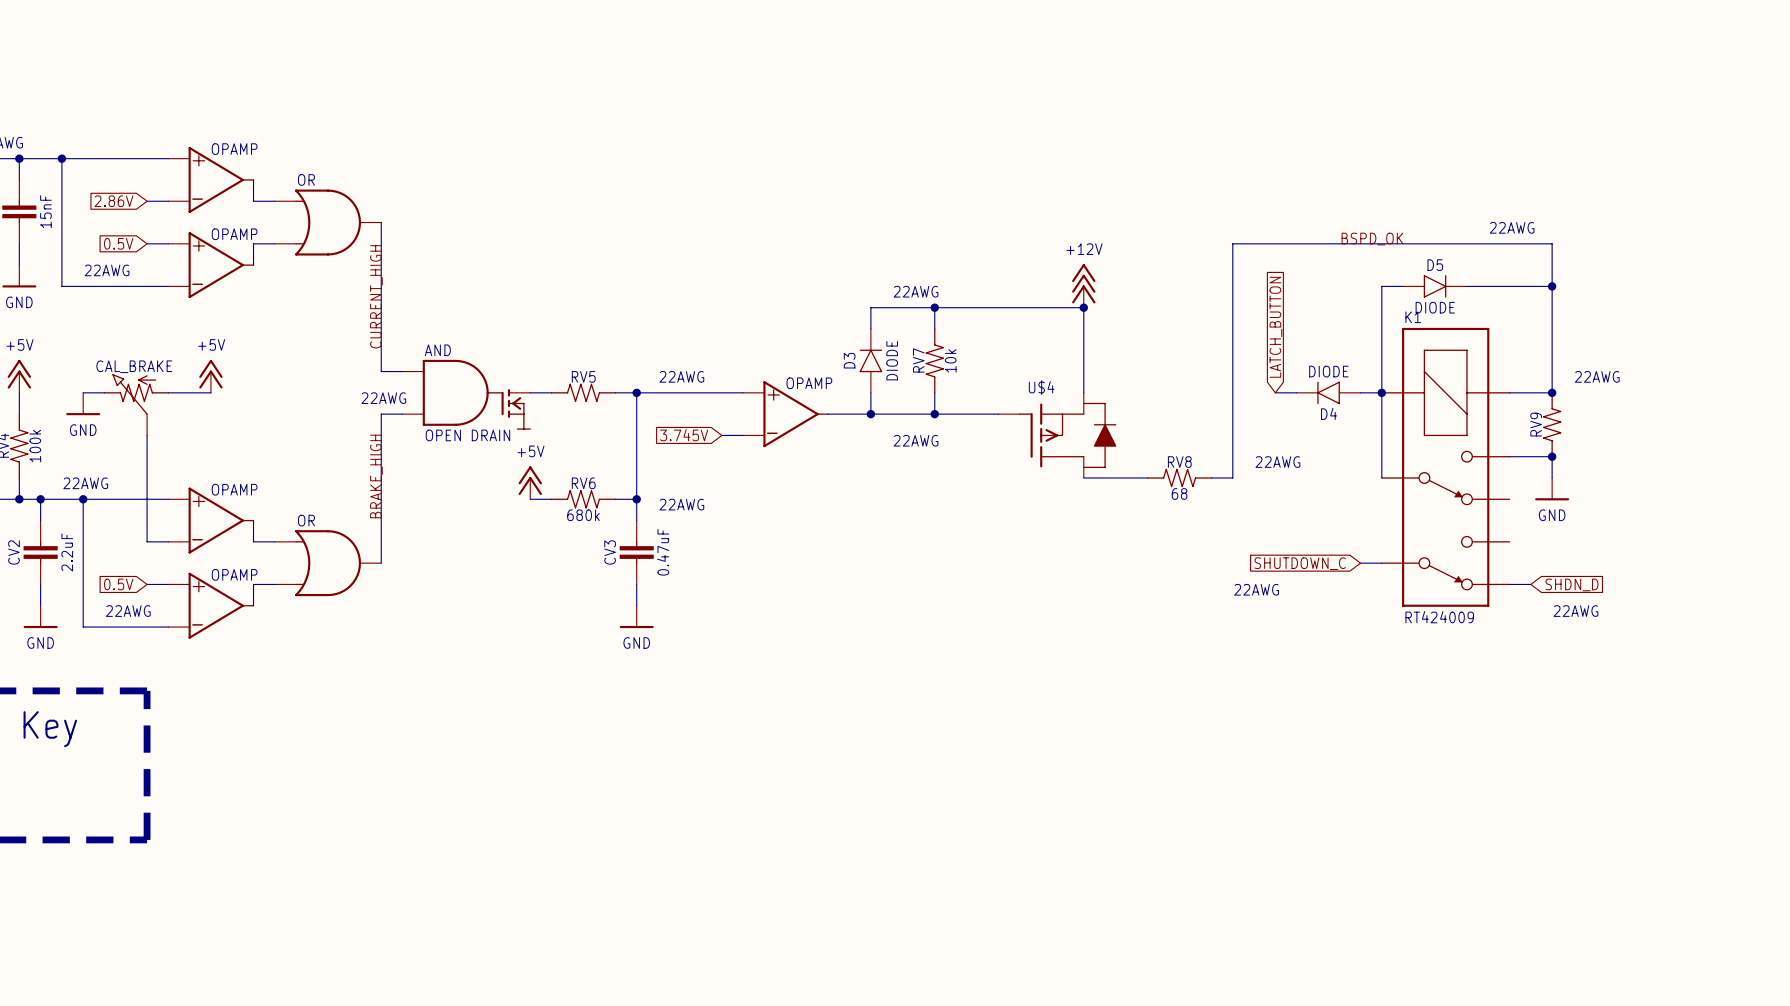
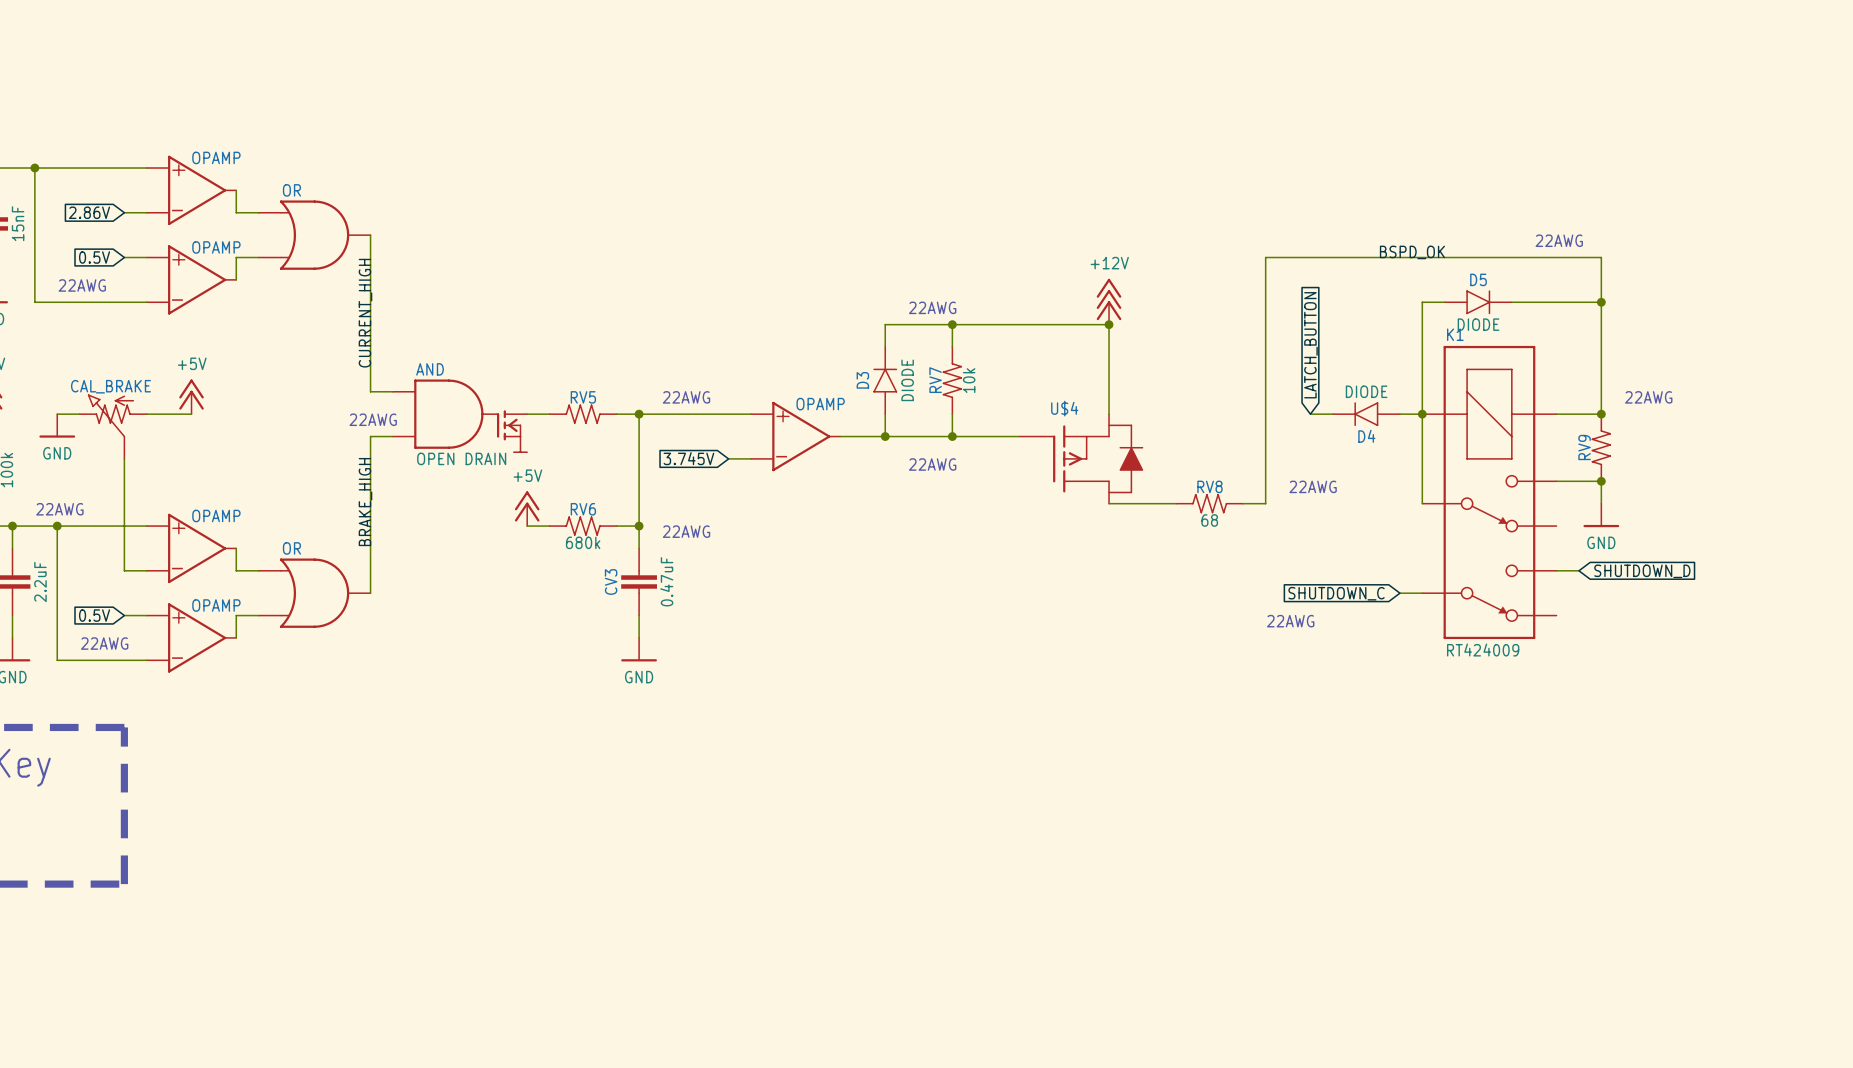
global label: none -> SHUTDOWN_D (1642, 571)
wire: (1509, 584) (1530, 584) -> (1556, 570) (1578, 570)
global label: SHDN_D (1572, 584) -> none
text: 22AWG (1575, 611) -> none

